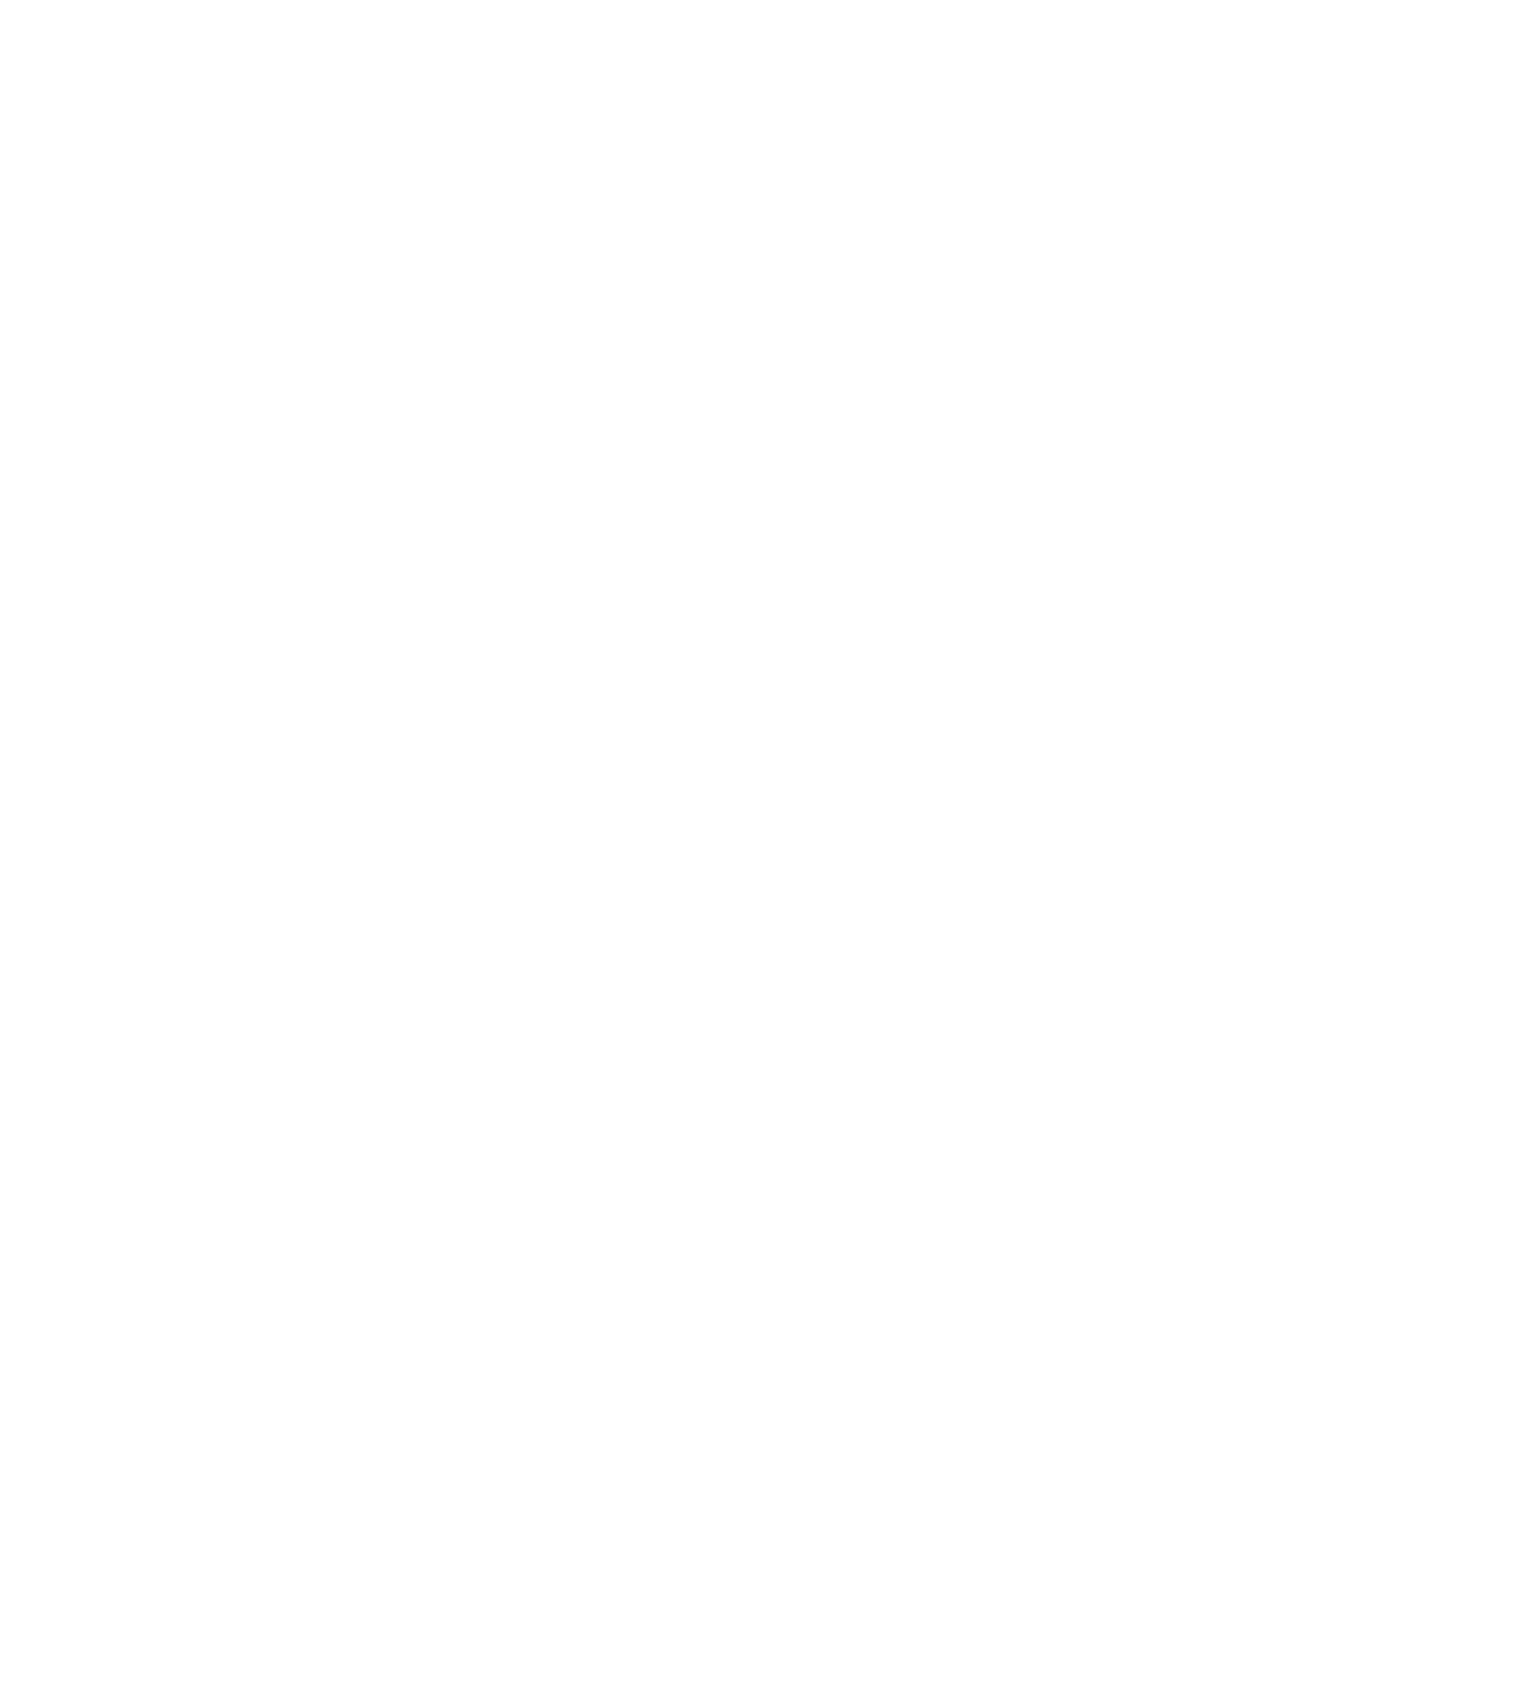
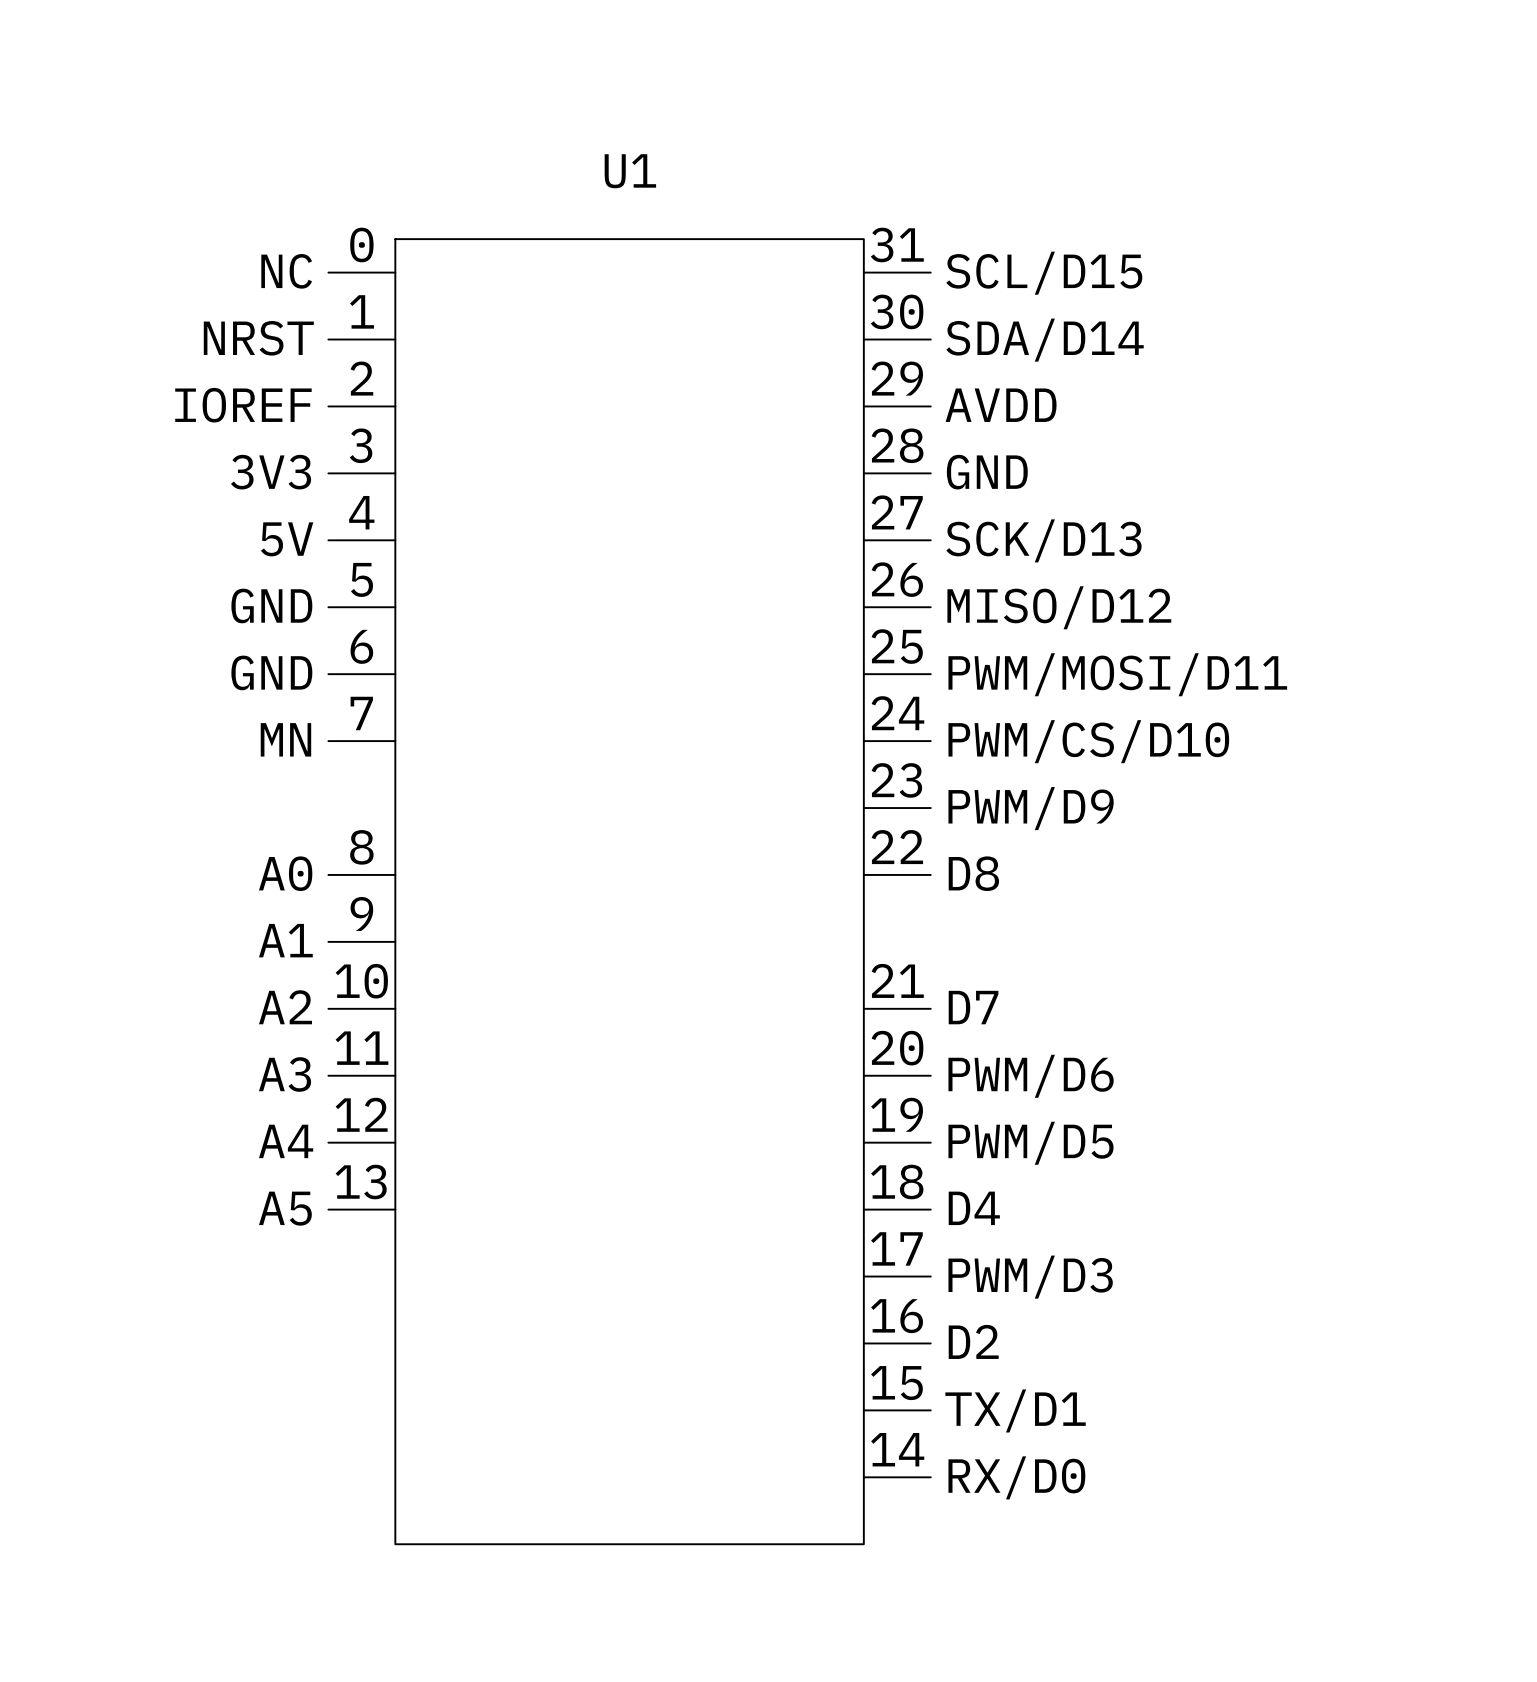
U1: none -> (629, 891)

